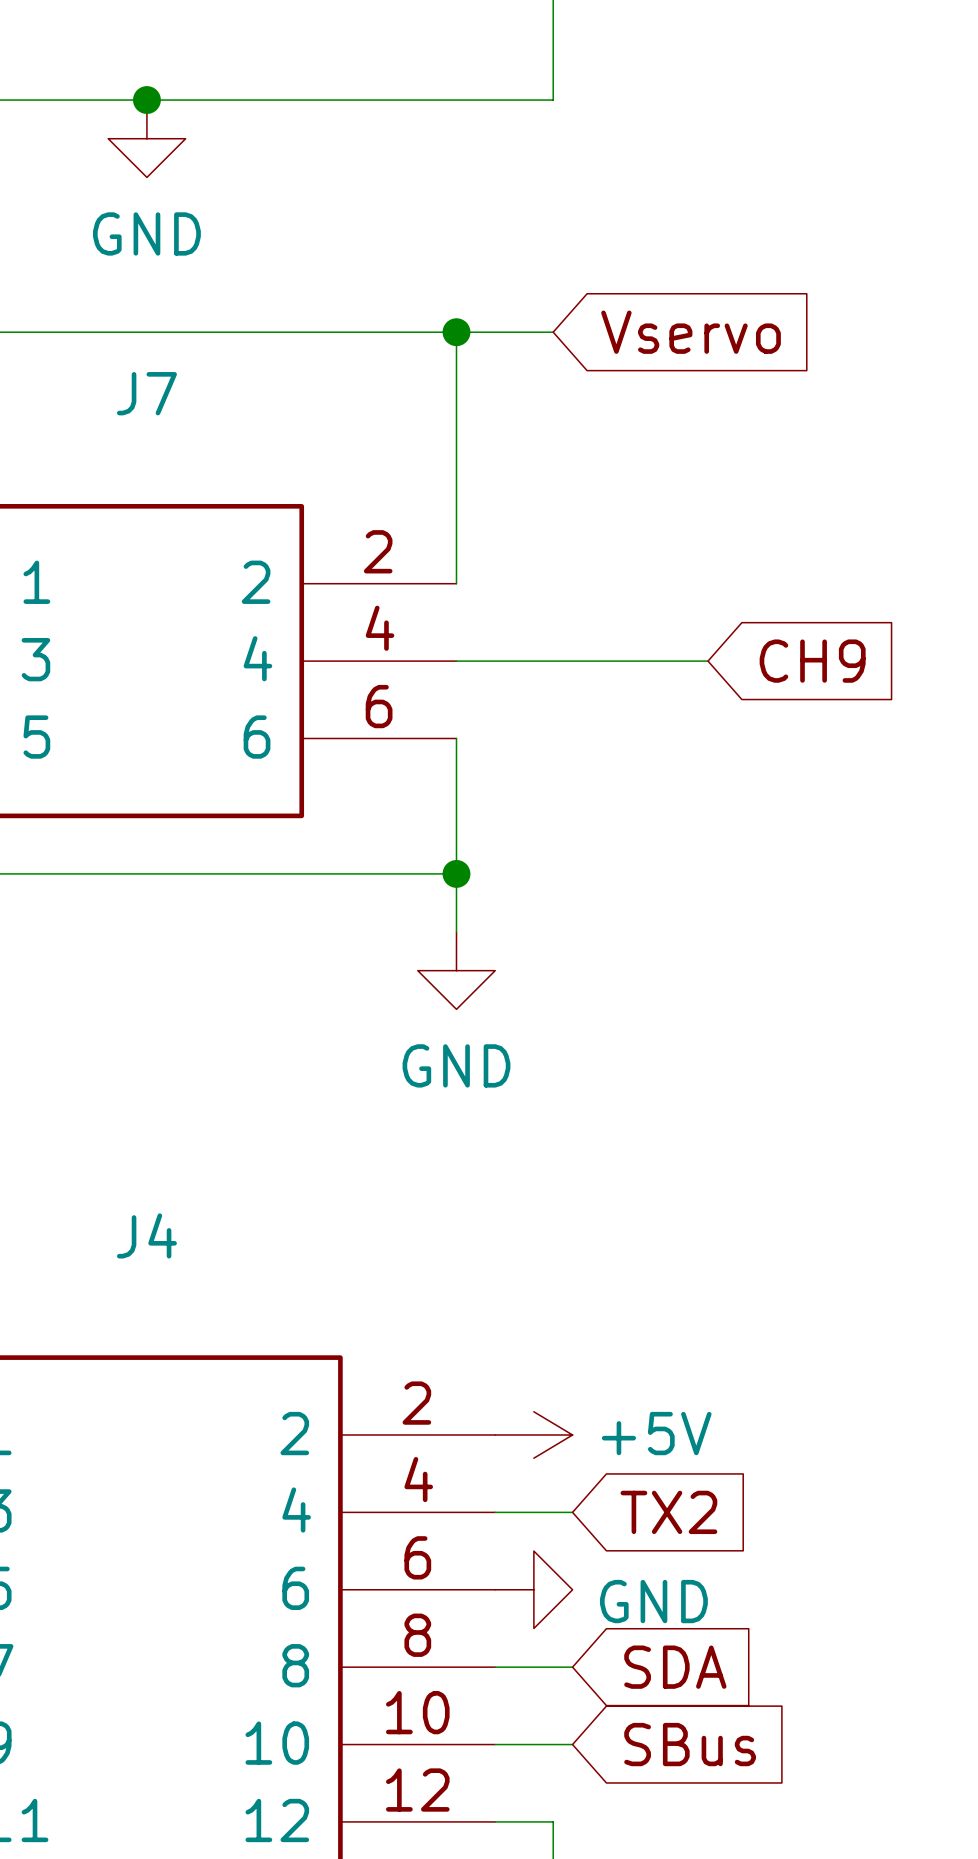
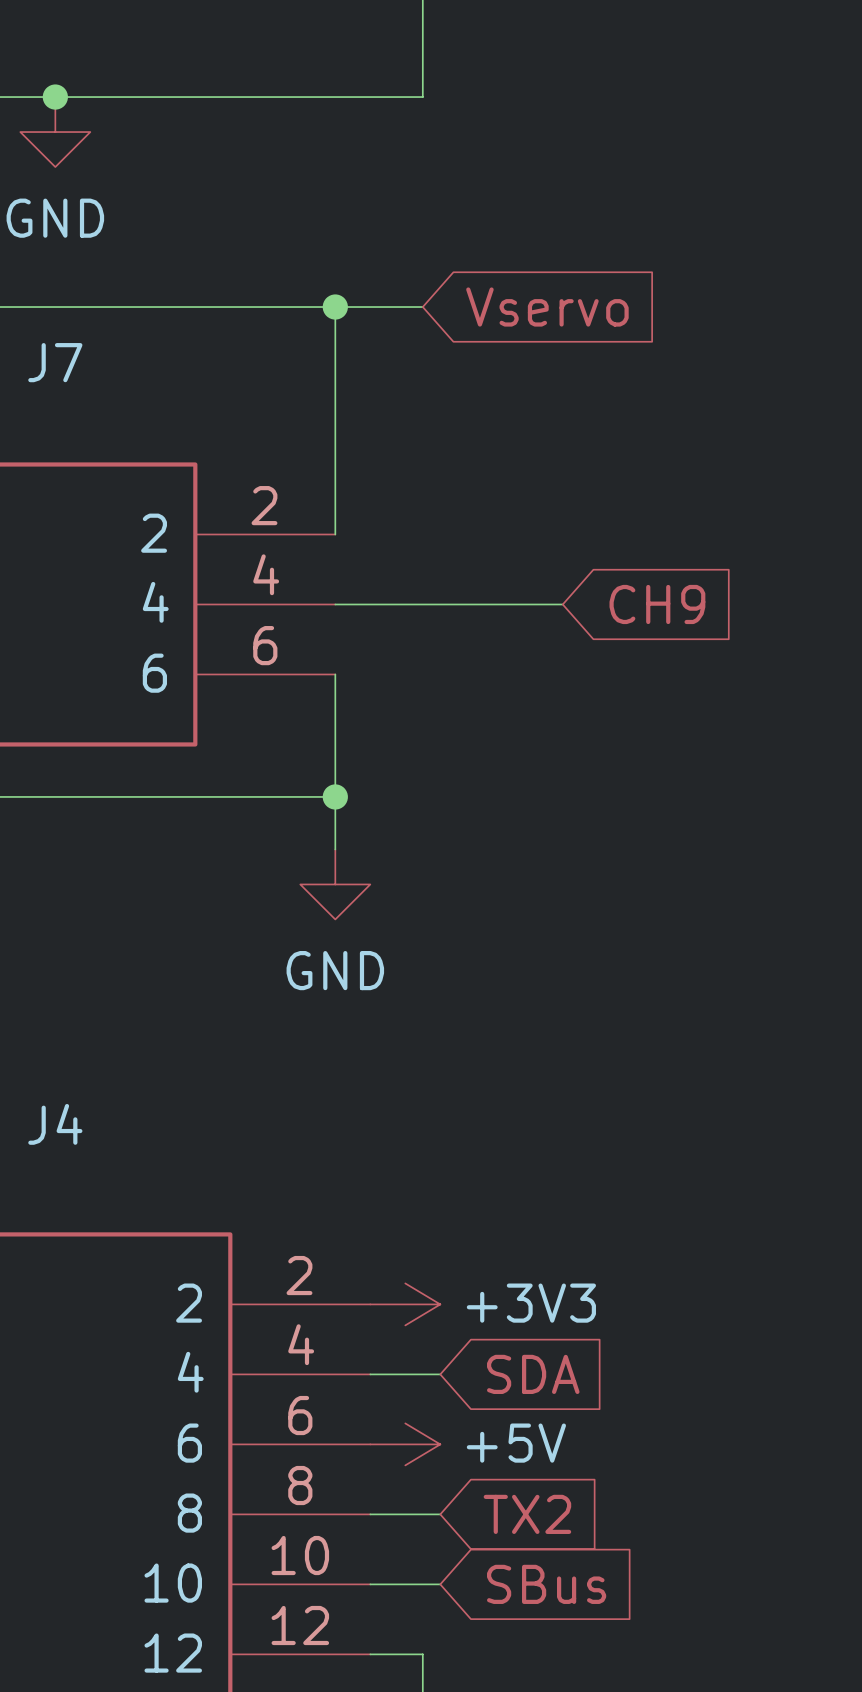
power symbol: +5V (533, 1434) -> +3V3 (405, 1304)
global label: TX2 (668, 1512) -> SDA (533, 1374)
power symbol: GND (533, 1589) -> +5V (405, 1444)
global label: SDA (675, 1667) -> TX2 (527, 1514)

